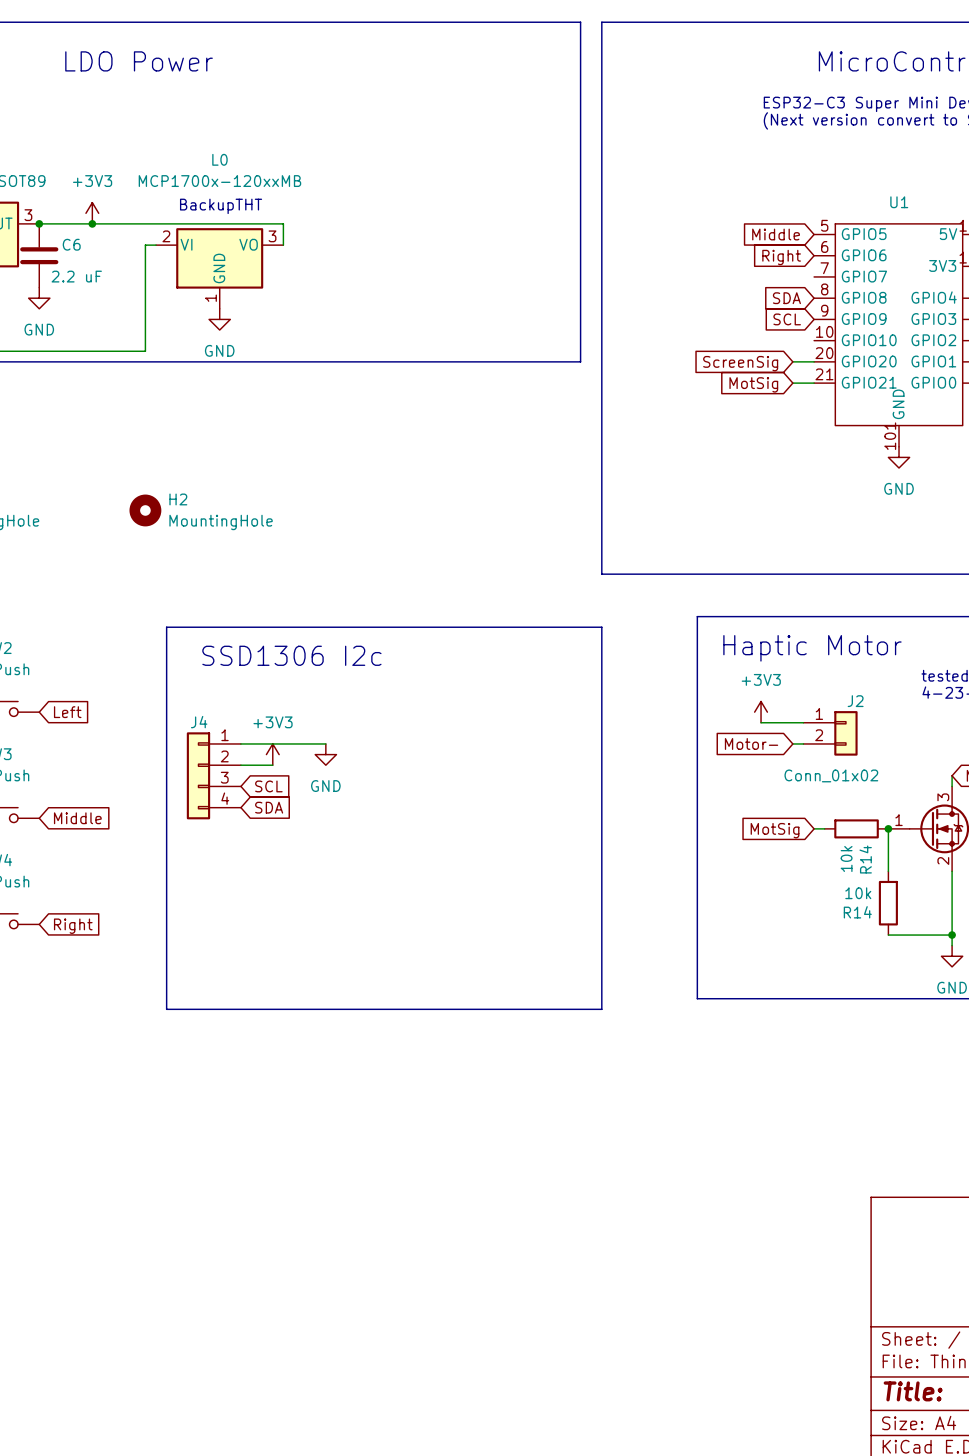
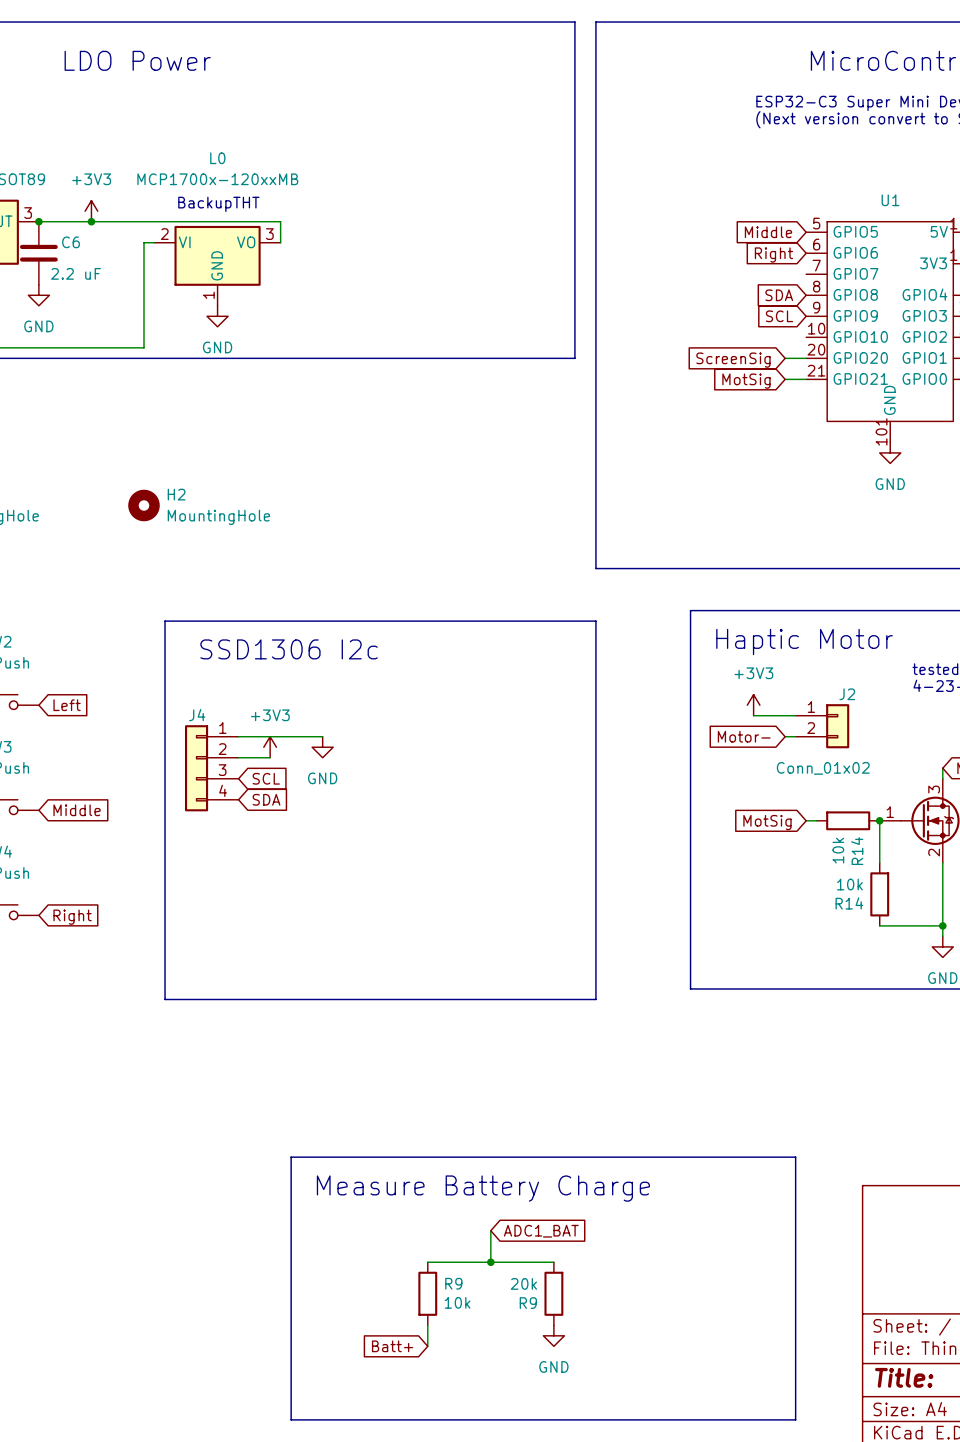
line: none -> (291, 1157) (795, 1157) (795, 1419) (291, 1419) (291, 1157)
text: none -> Measure Battery Charge (483, 1188)
wire: none -> (490, 1230) (490, 1262)
global label: none -> ADC1_BAT (541, 1231)
wire: none -> (427, 1262) (553, 1262)
junction: none -> (490, 1262)
R9: none -> 10k (427, 1293)
R9: none -> 20k (553, 1293)
wire: none -> (427, 1325) (427, 1346)
power symbol: none -> GND (553, 1335)
global label: none -> Batt+ (392, 1346)

